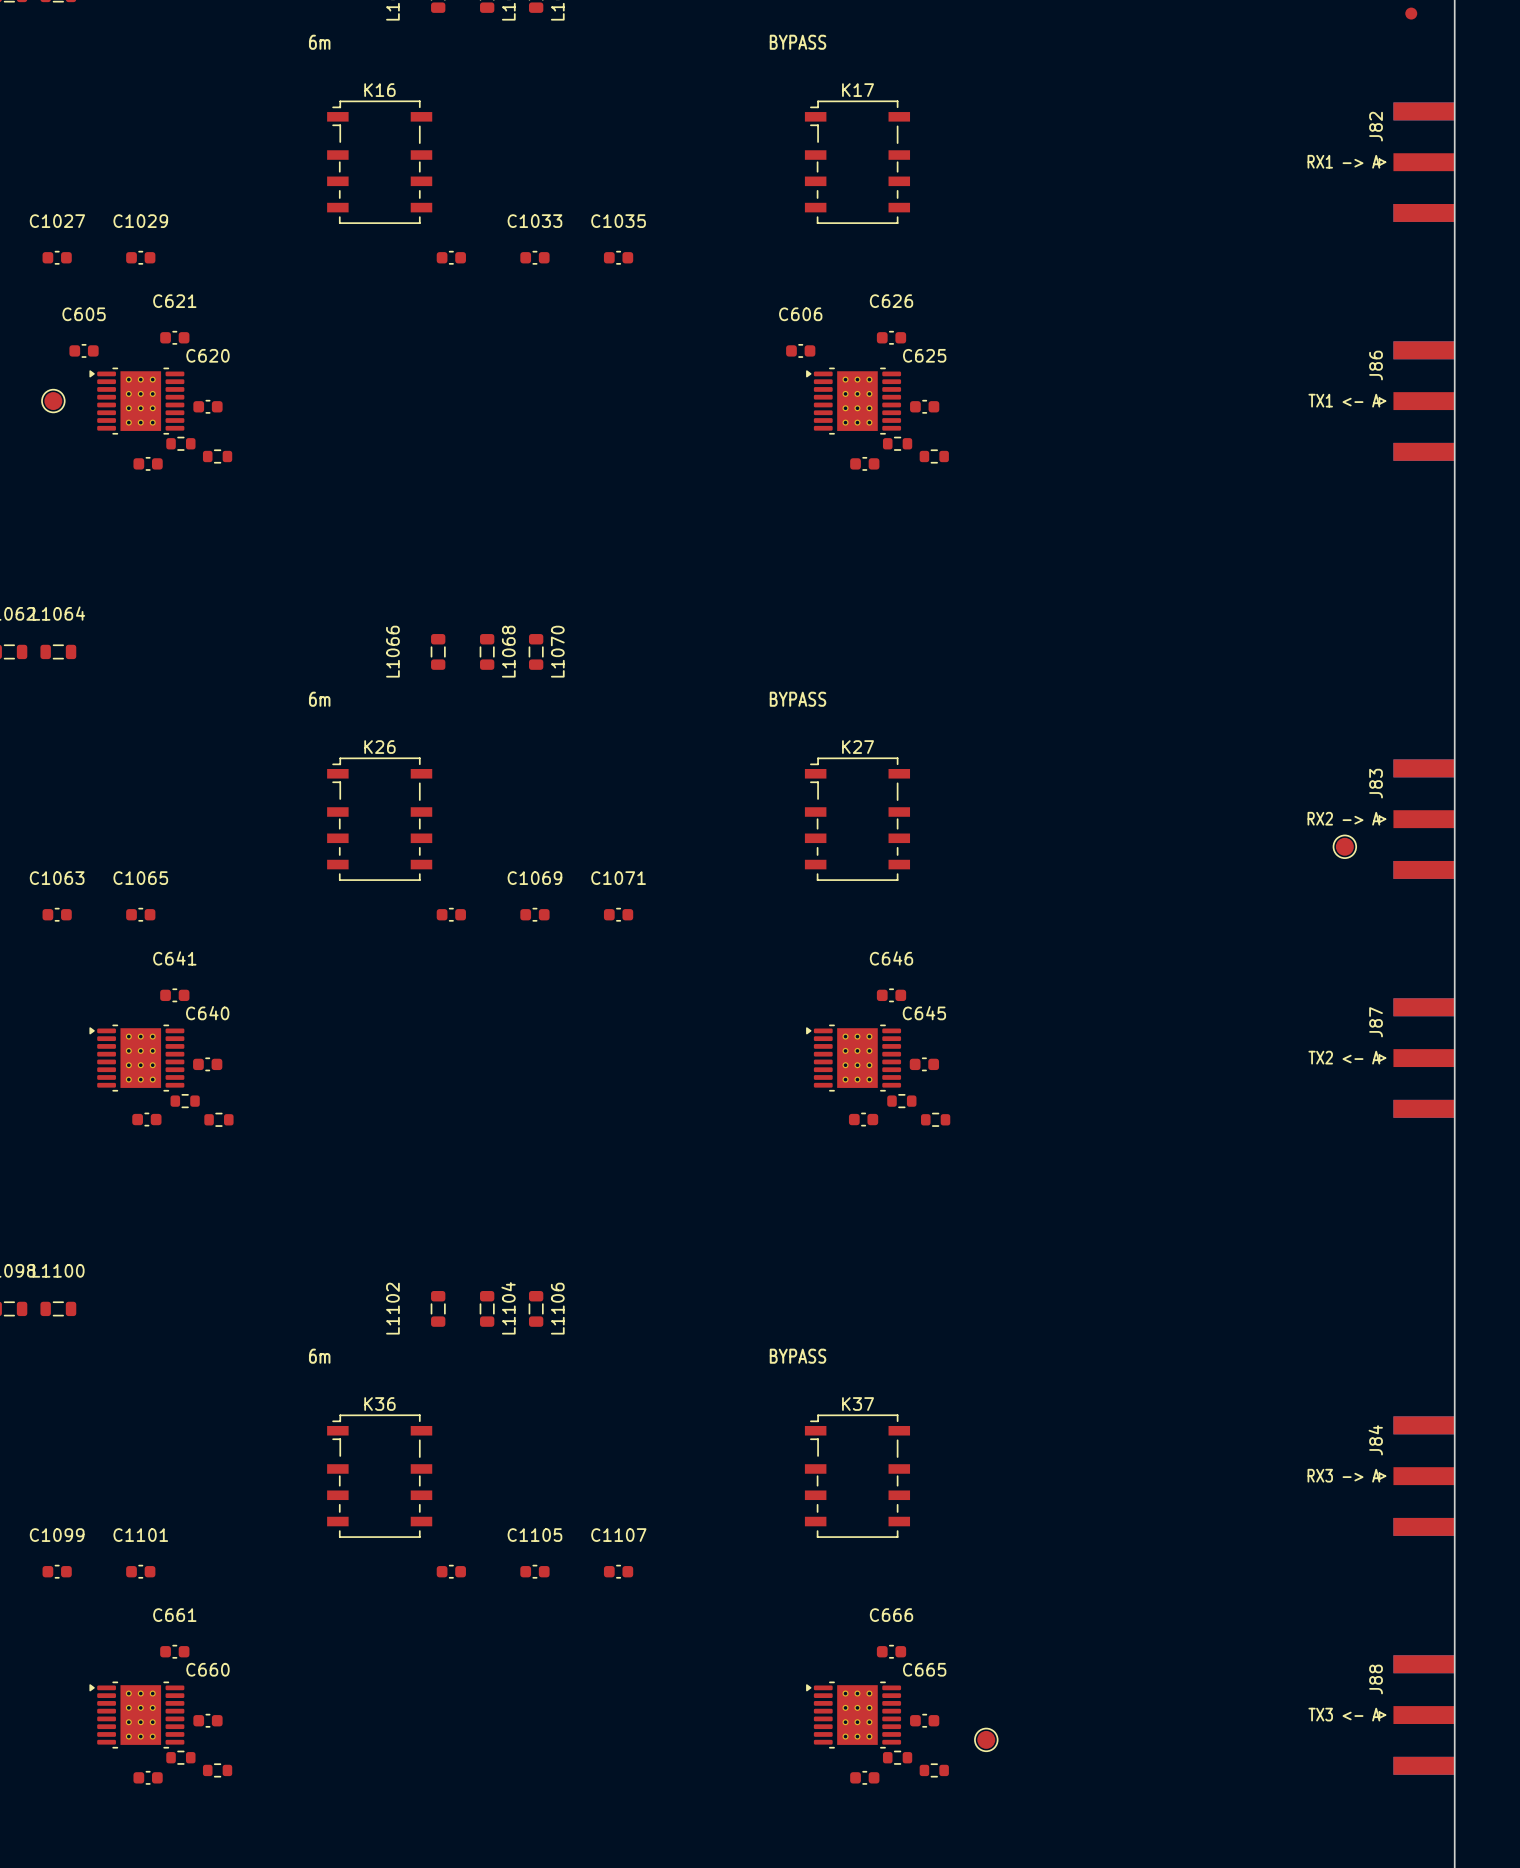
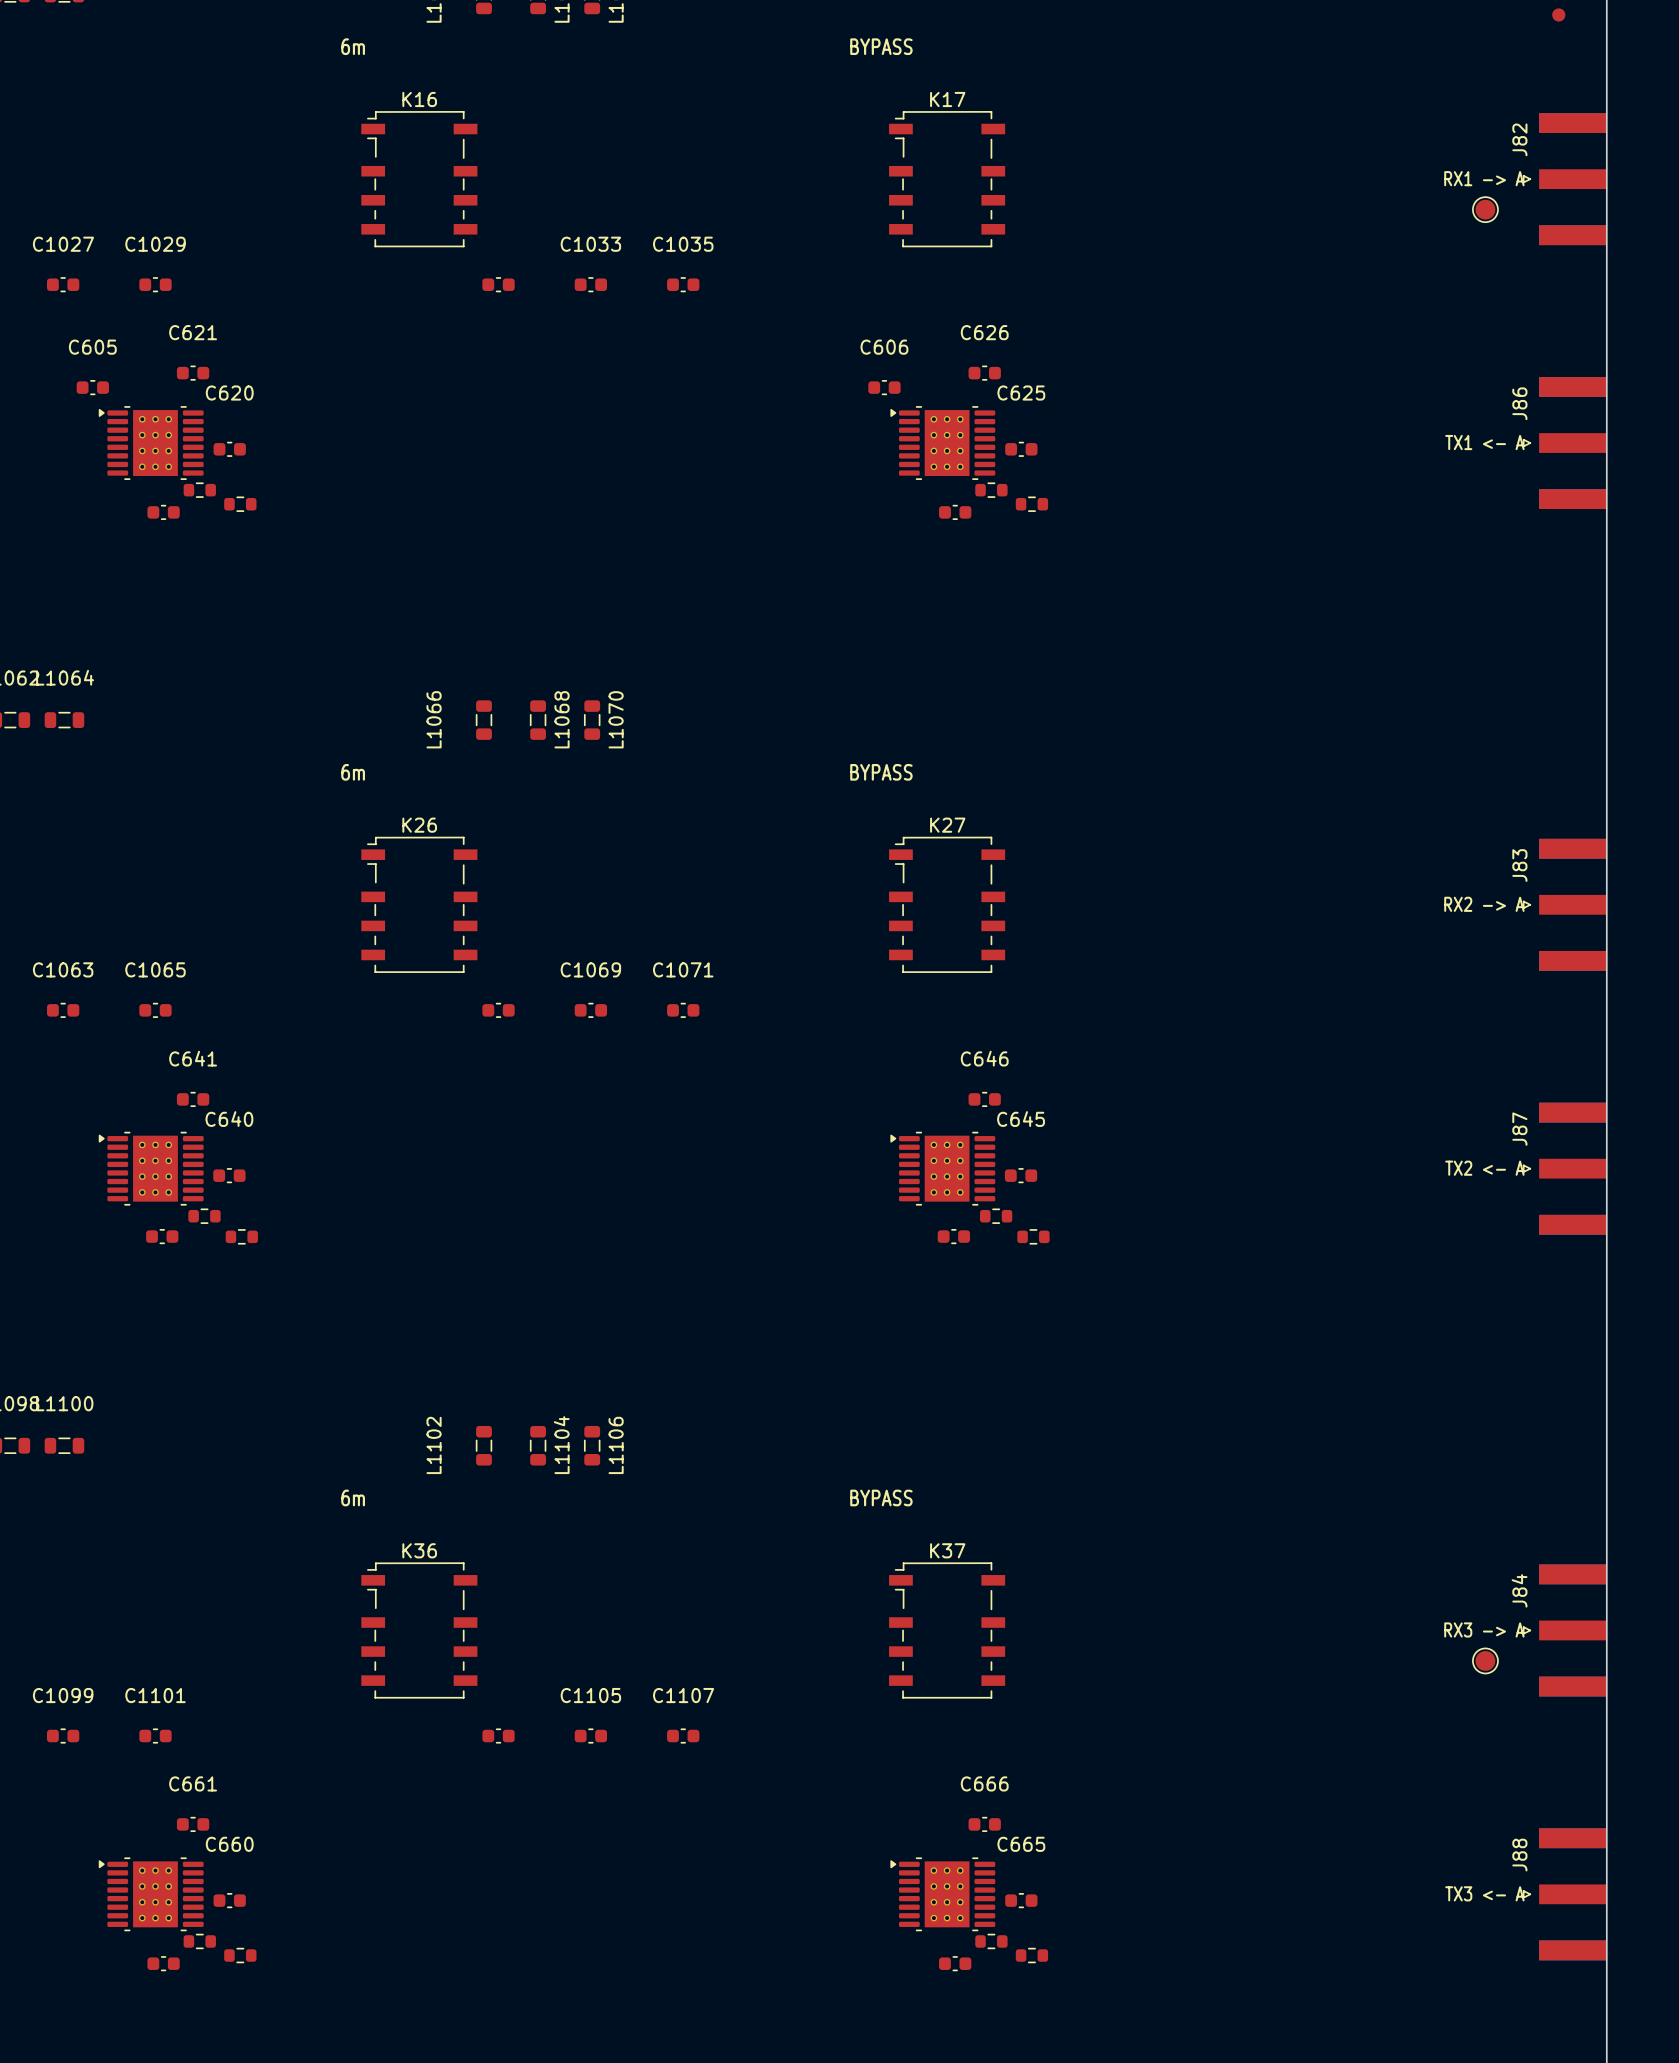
part: none -> (1485, 209)
part: (53, 401) -> none
part: (1344, 846) -> none
part: none -> (1485, 1660)
part: (986, 1739) -> none

